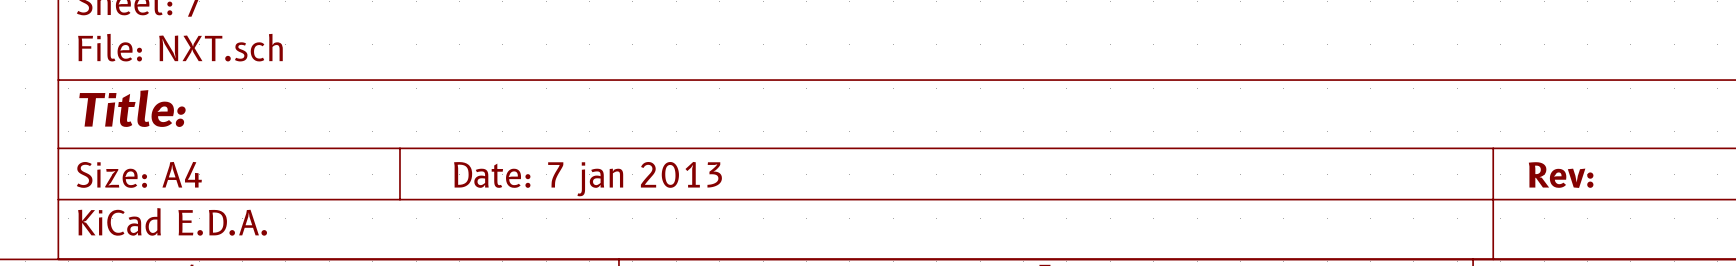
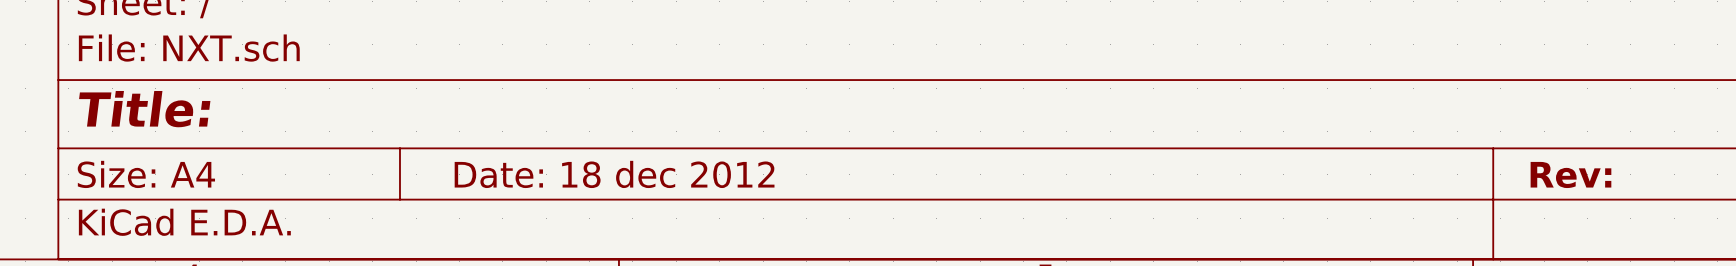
title block: Date: 7 jan 2013 (588, 179) -> Date: 18 dec 2012 (614, 174)

